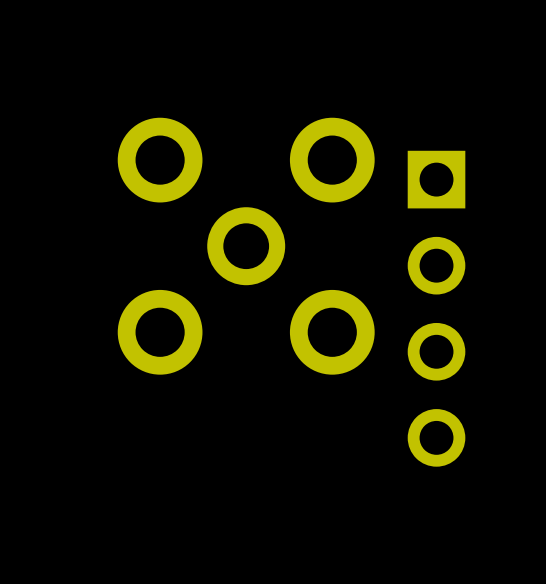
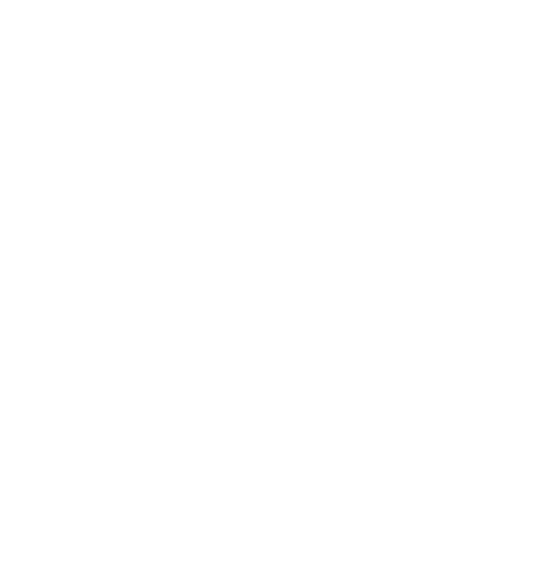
part: (246, 246) -> none
part: (436, 308) -> none

